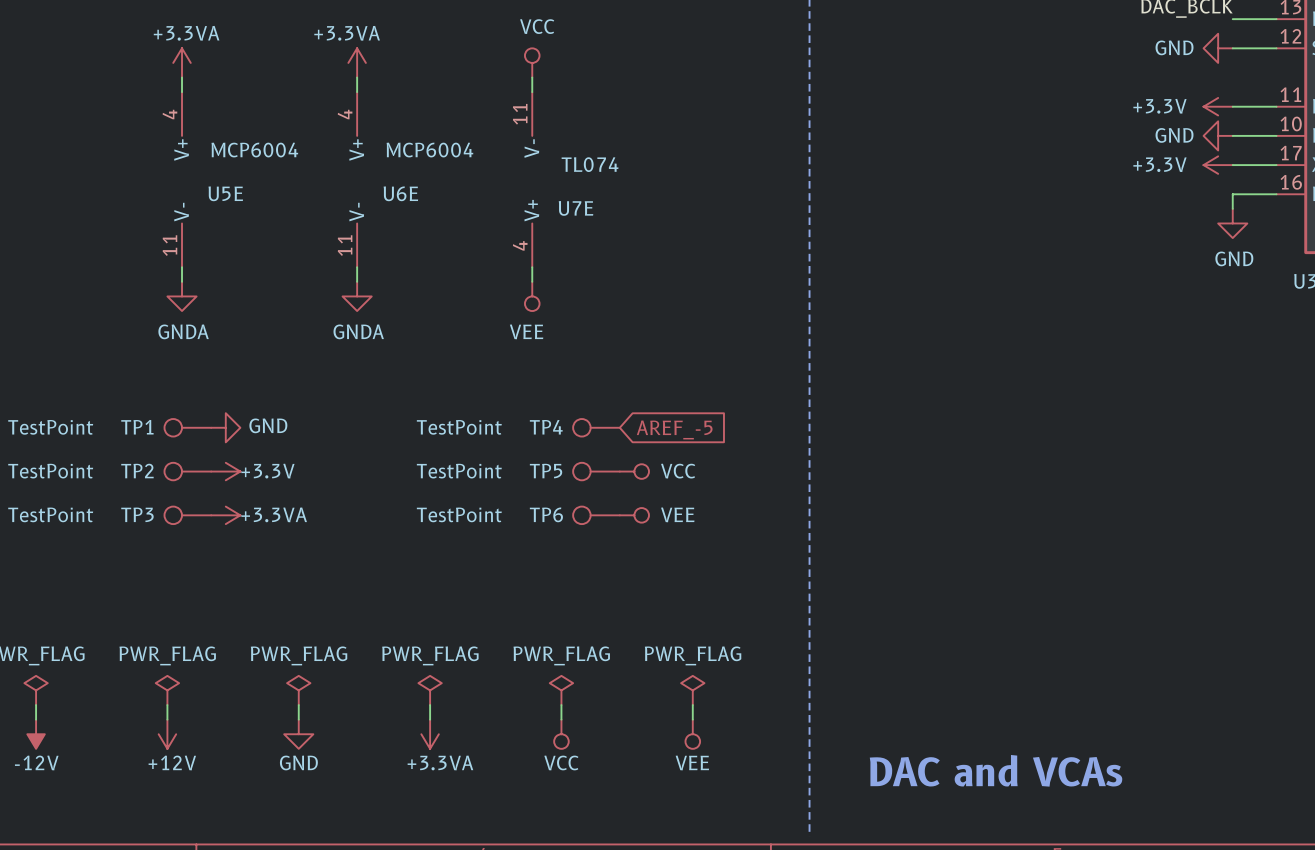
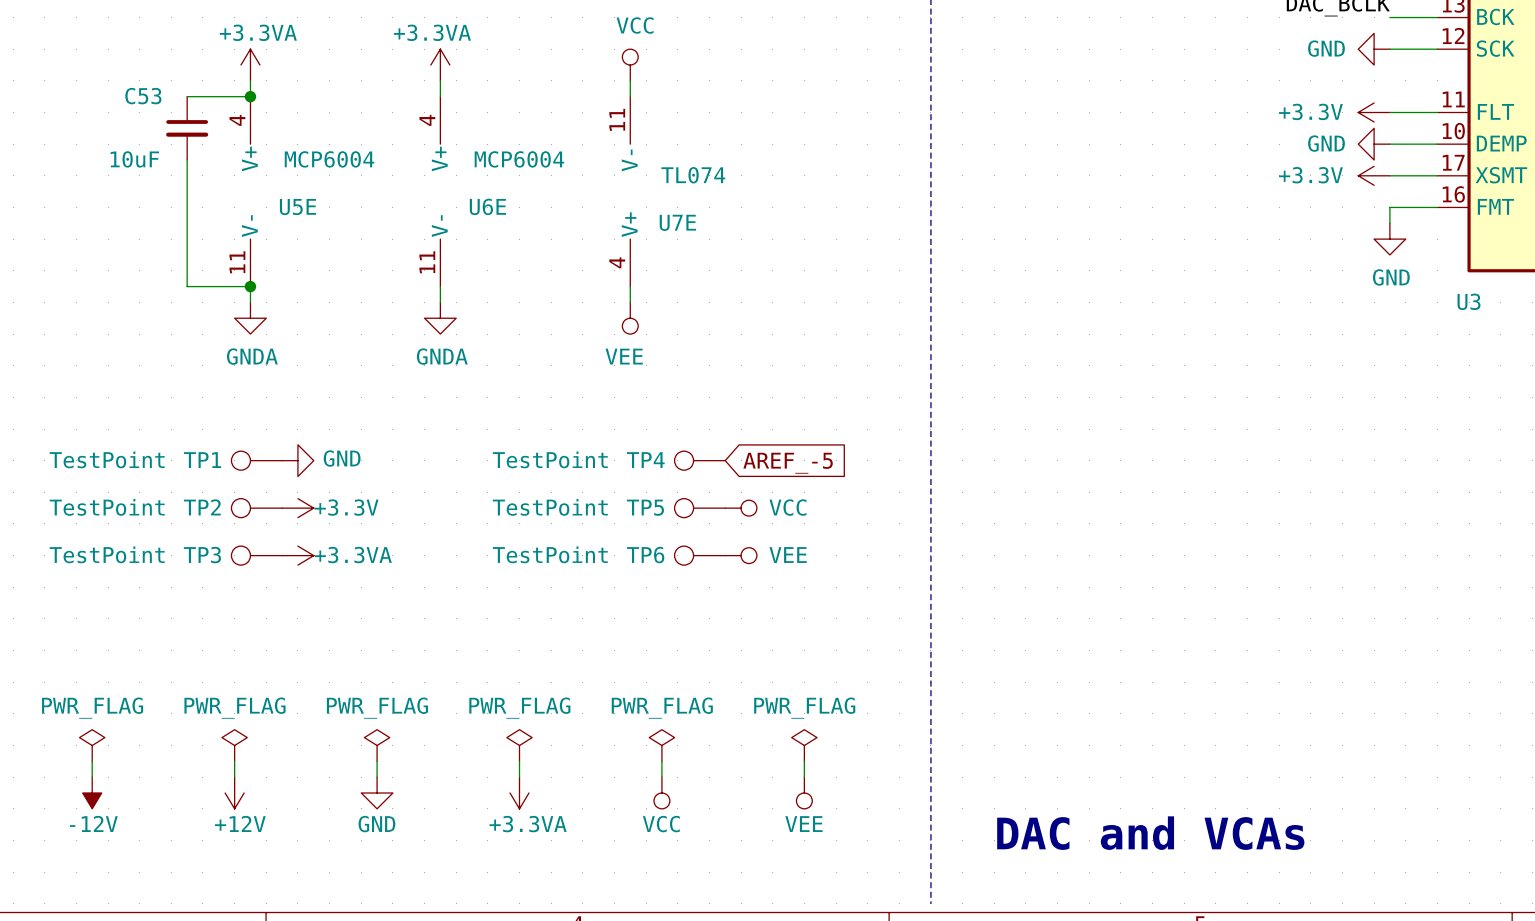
wire: none -> (187, 96) (250, 96)
junction: none -> (250, 96)
C53: none -> 10uF (187, 128)
wire: none -> (187, 159) (187, 286) (250, 286)
junction: none -> (250, 286)

